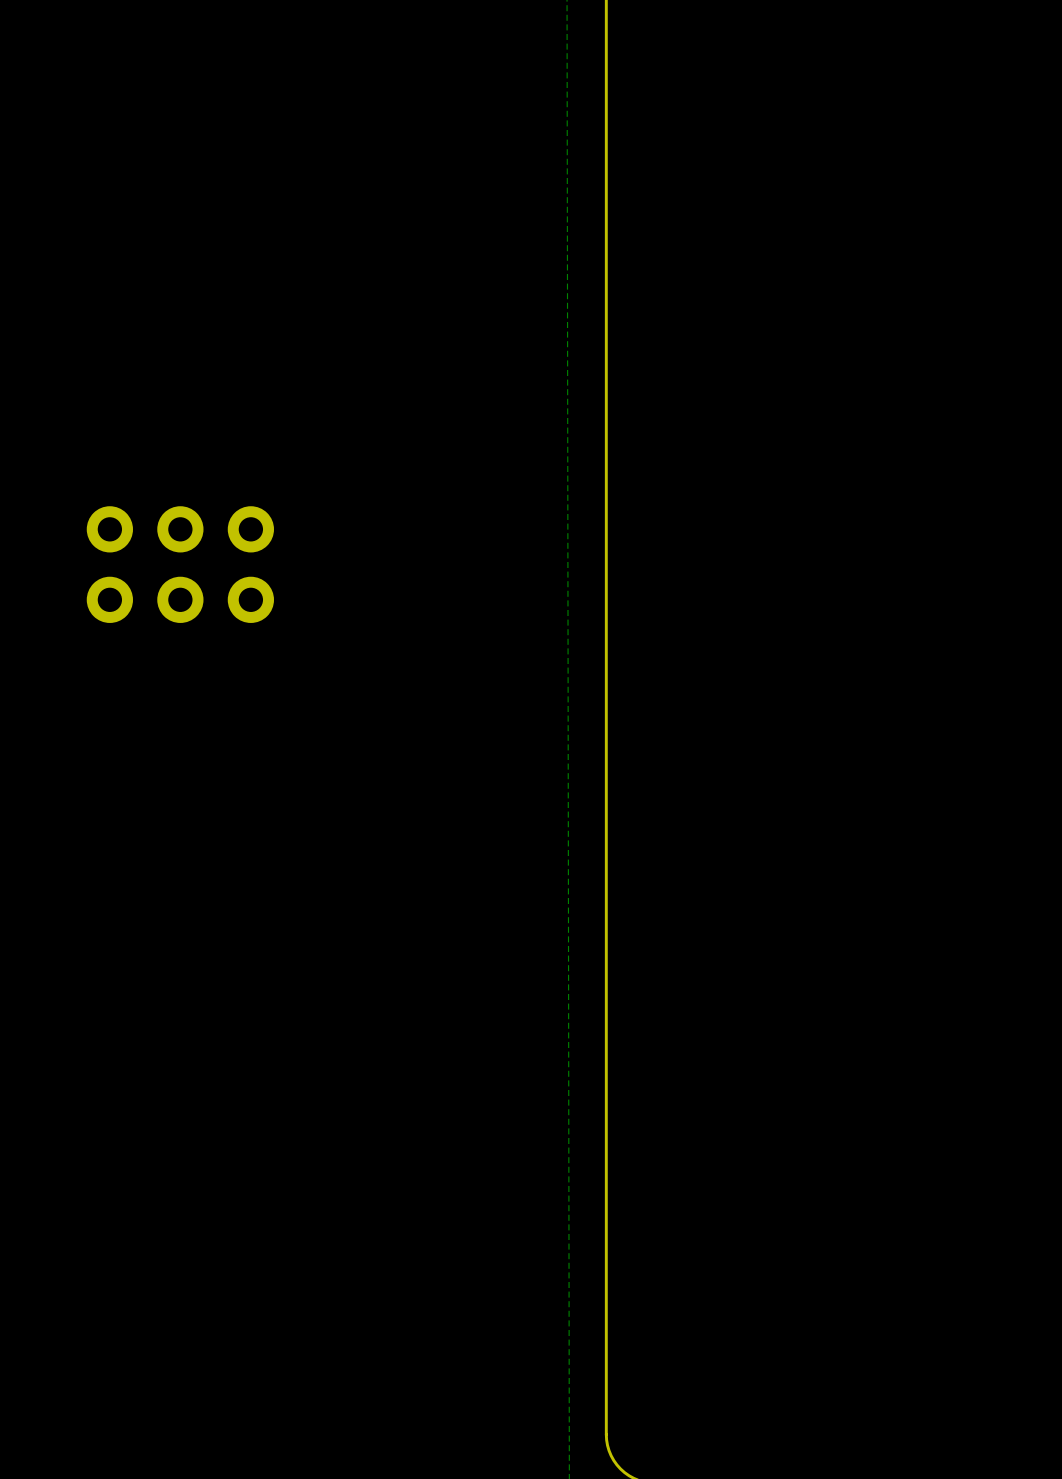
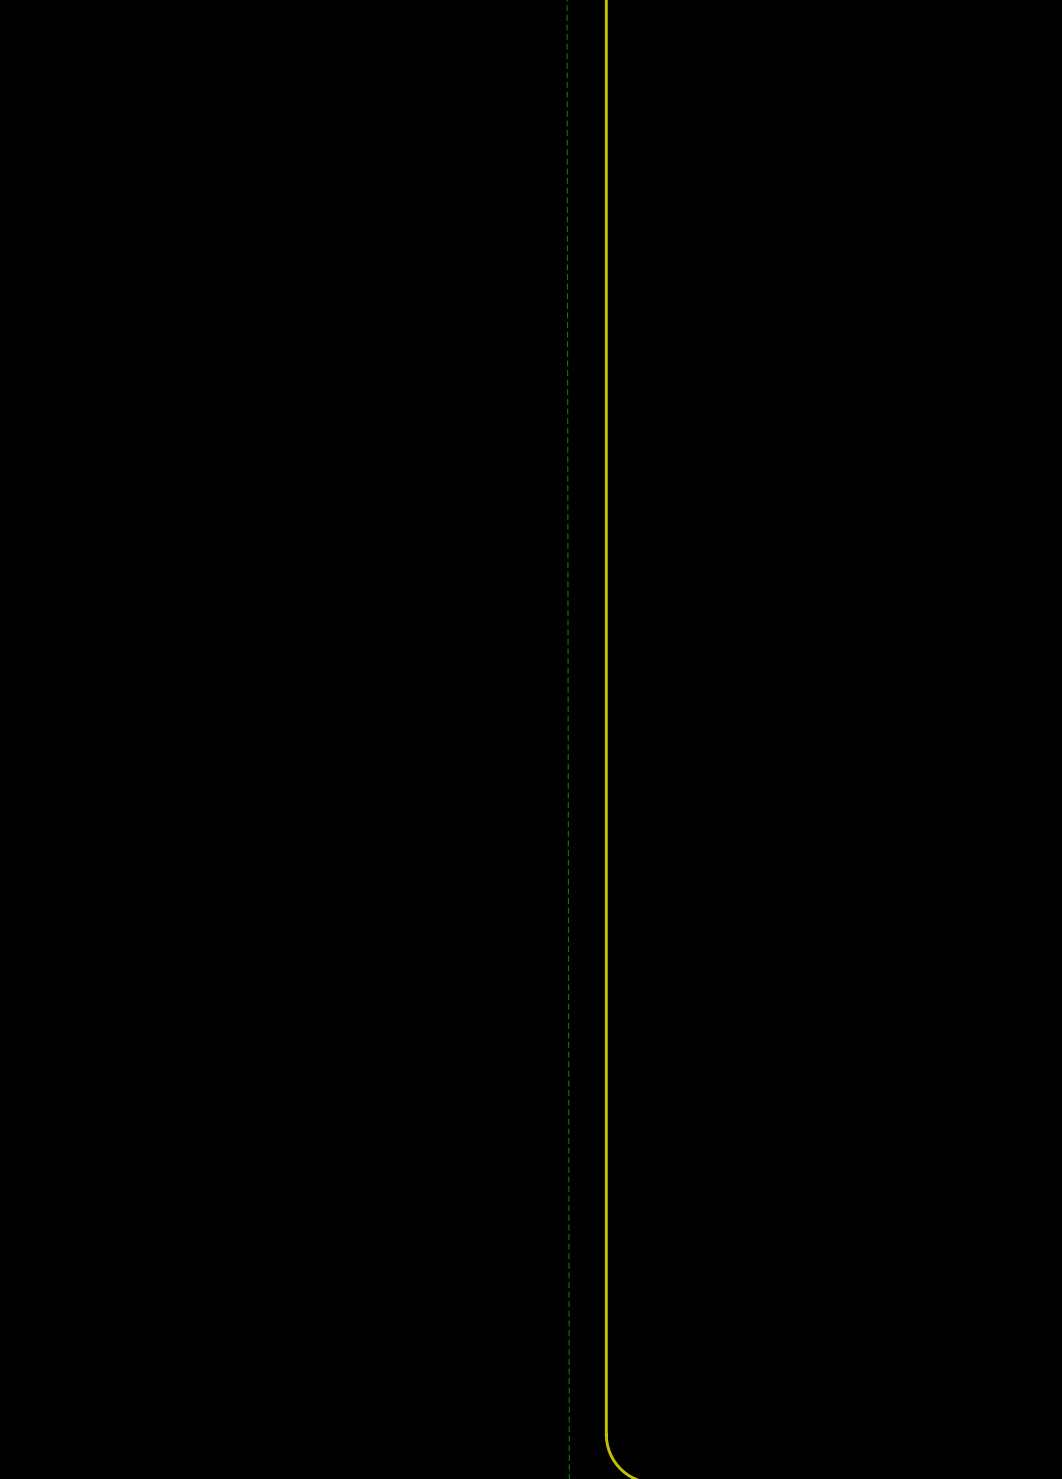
part: (109, 529) -> none
part: (180, 529) -> none
part: (250, 529) -> none
part: (109, 599) -> none
part: (180, 599) -> none
part: (250, 599) -> none

